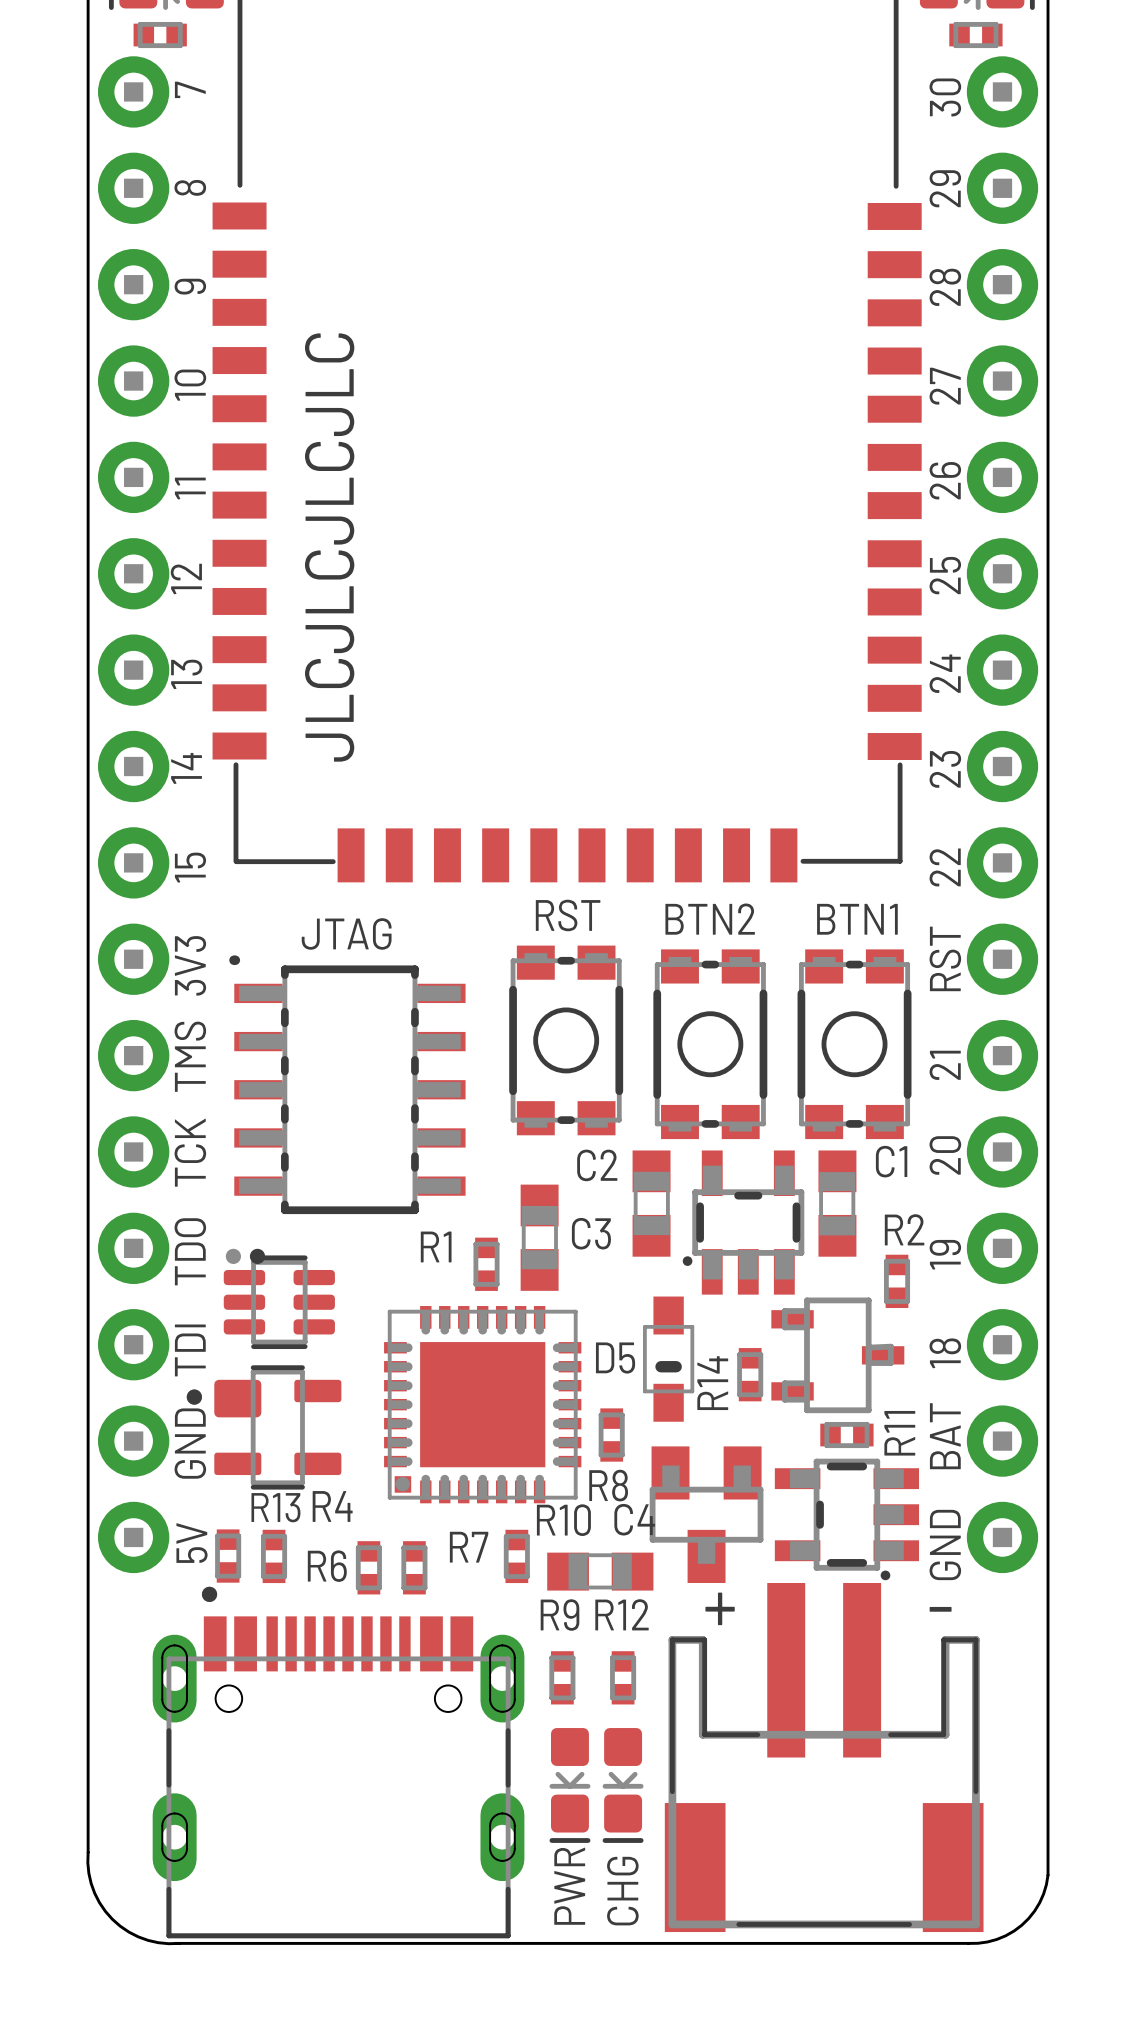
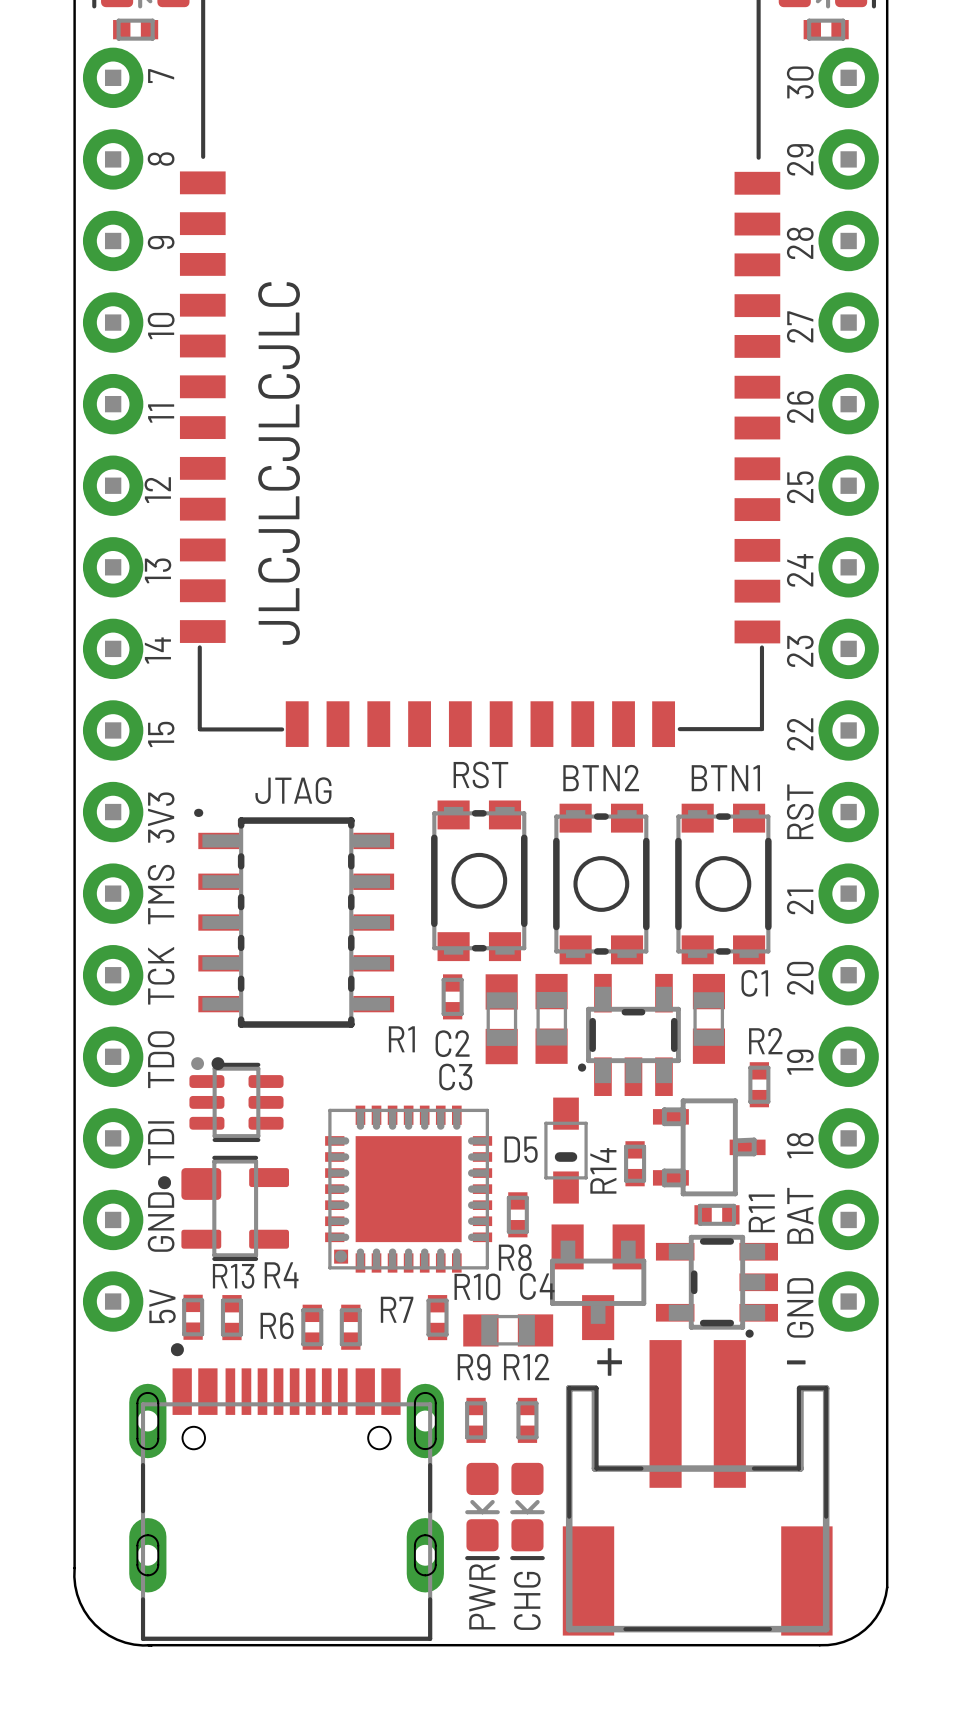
C2 name position: C2 (597, 1165) -> C2 (452, 1043)
C3 name position: C3 (591, 1233) -> C3 (455, 1077)
C3 position: (539, 1237) -> (501, 1019)
R1 name position: R1 (436, 1246) -> R1 (401, 1039)
R1 position: (486, 1264) -> (452, 996)

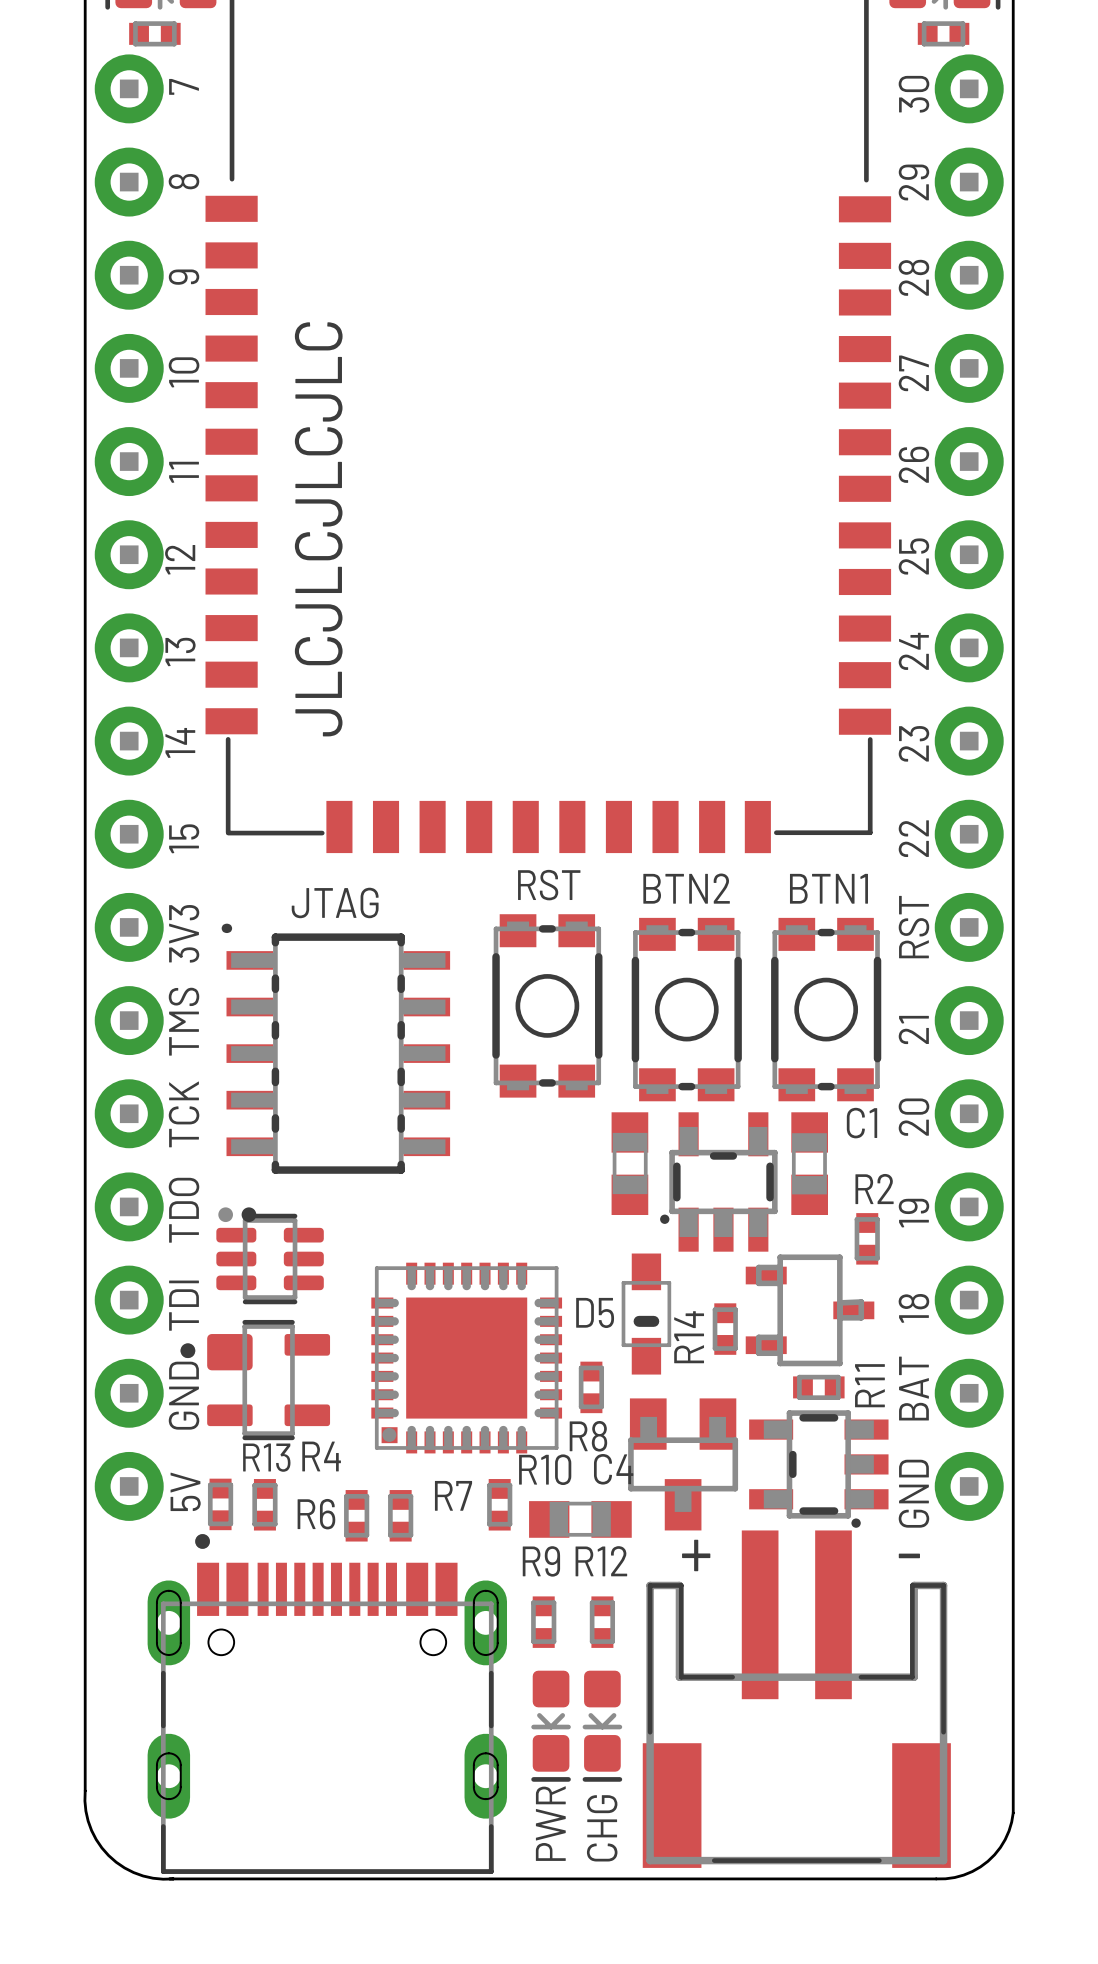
R1: (452, 996) -> none
C3: (501, 1019) -> none
C2 name: C2 (452, 1043) -> none

